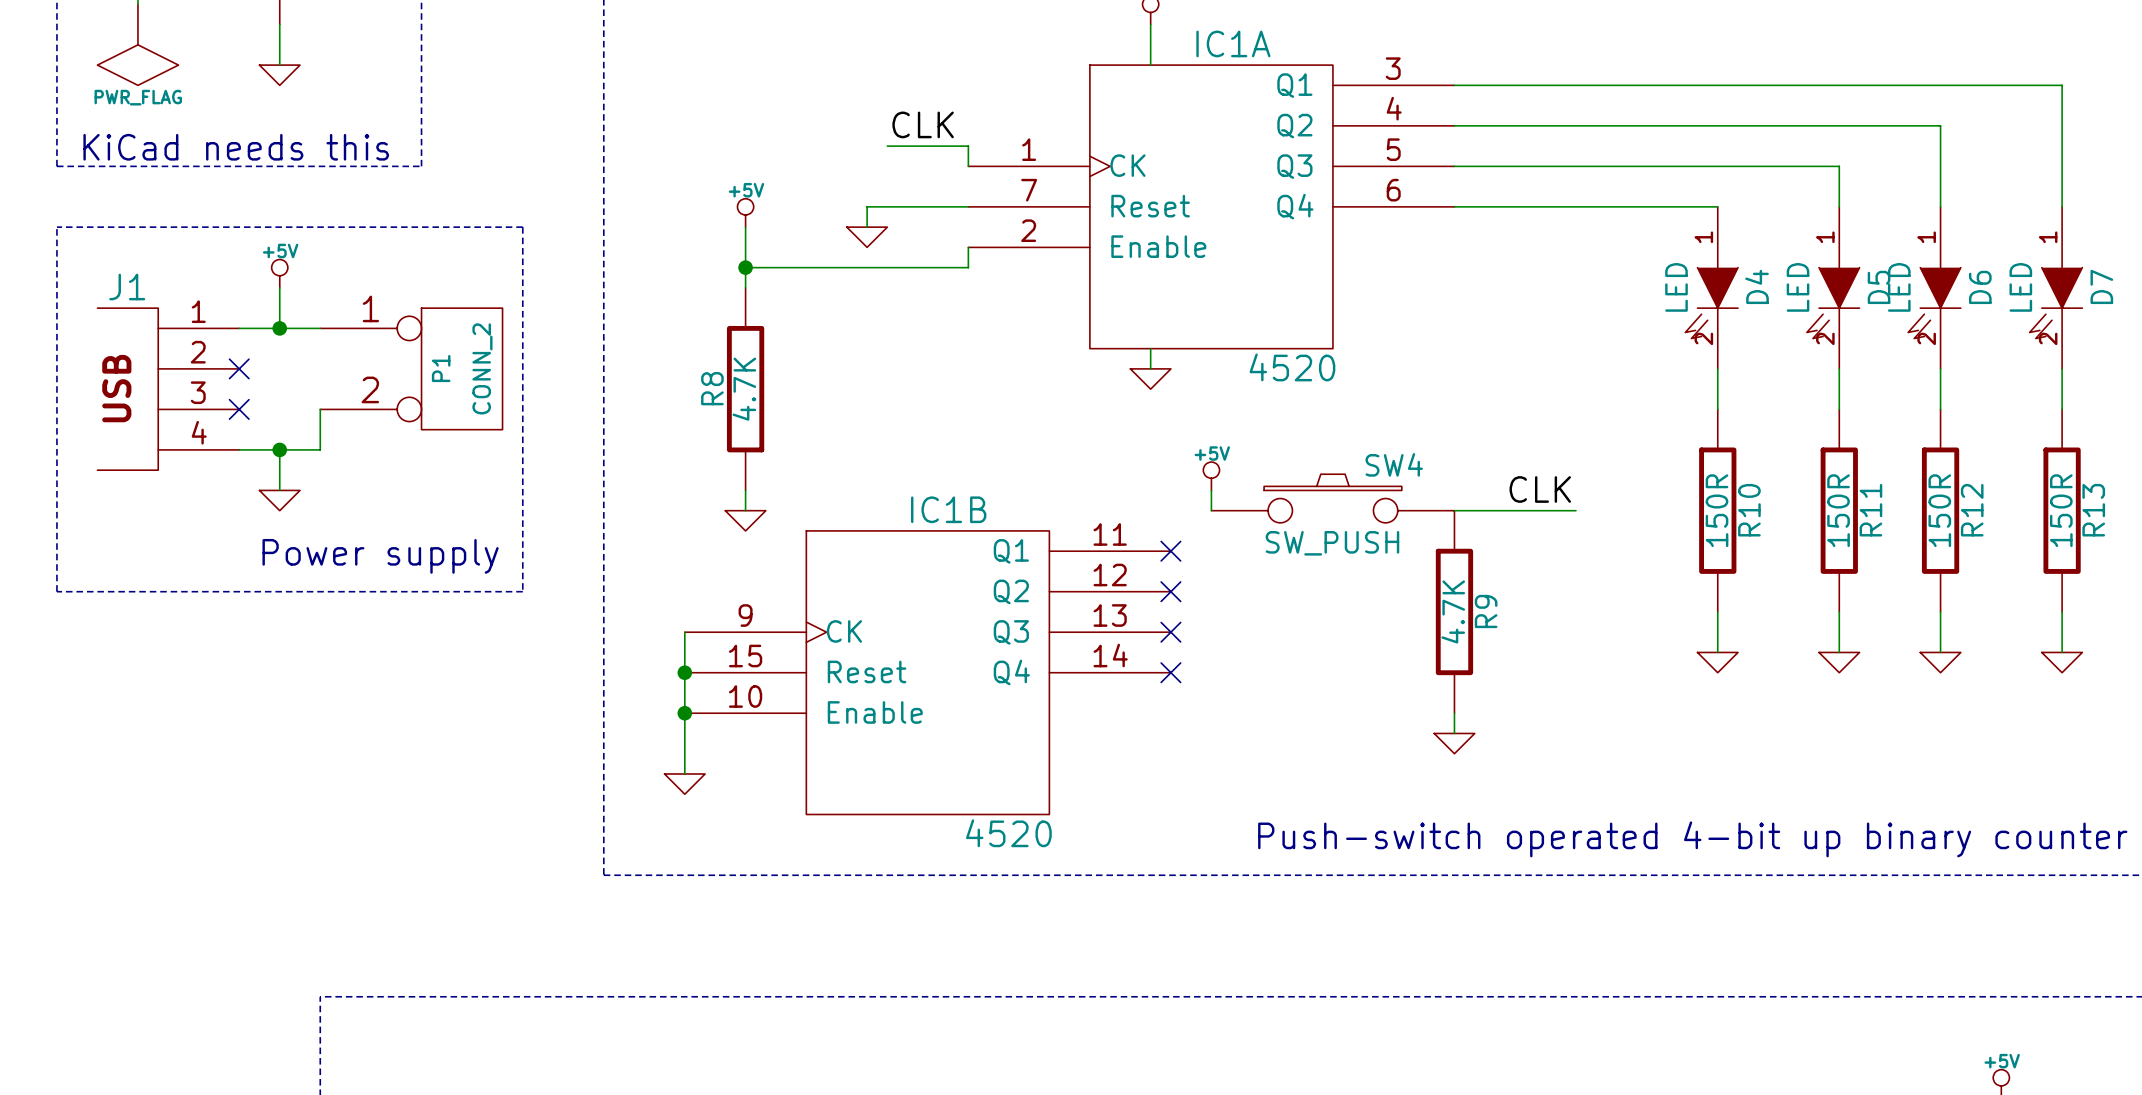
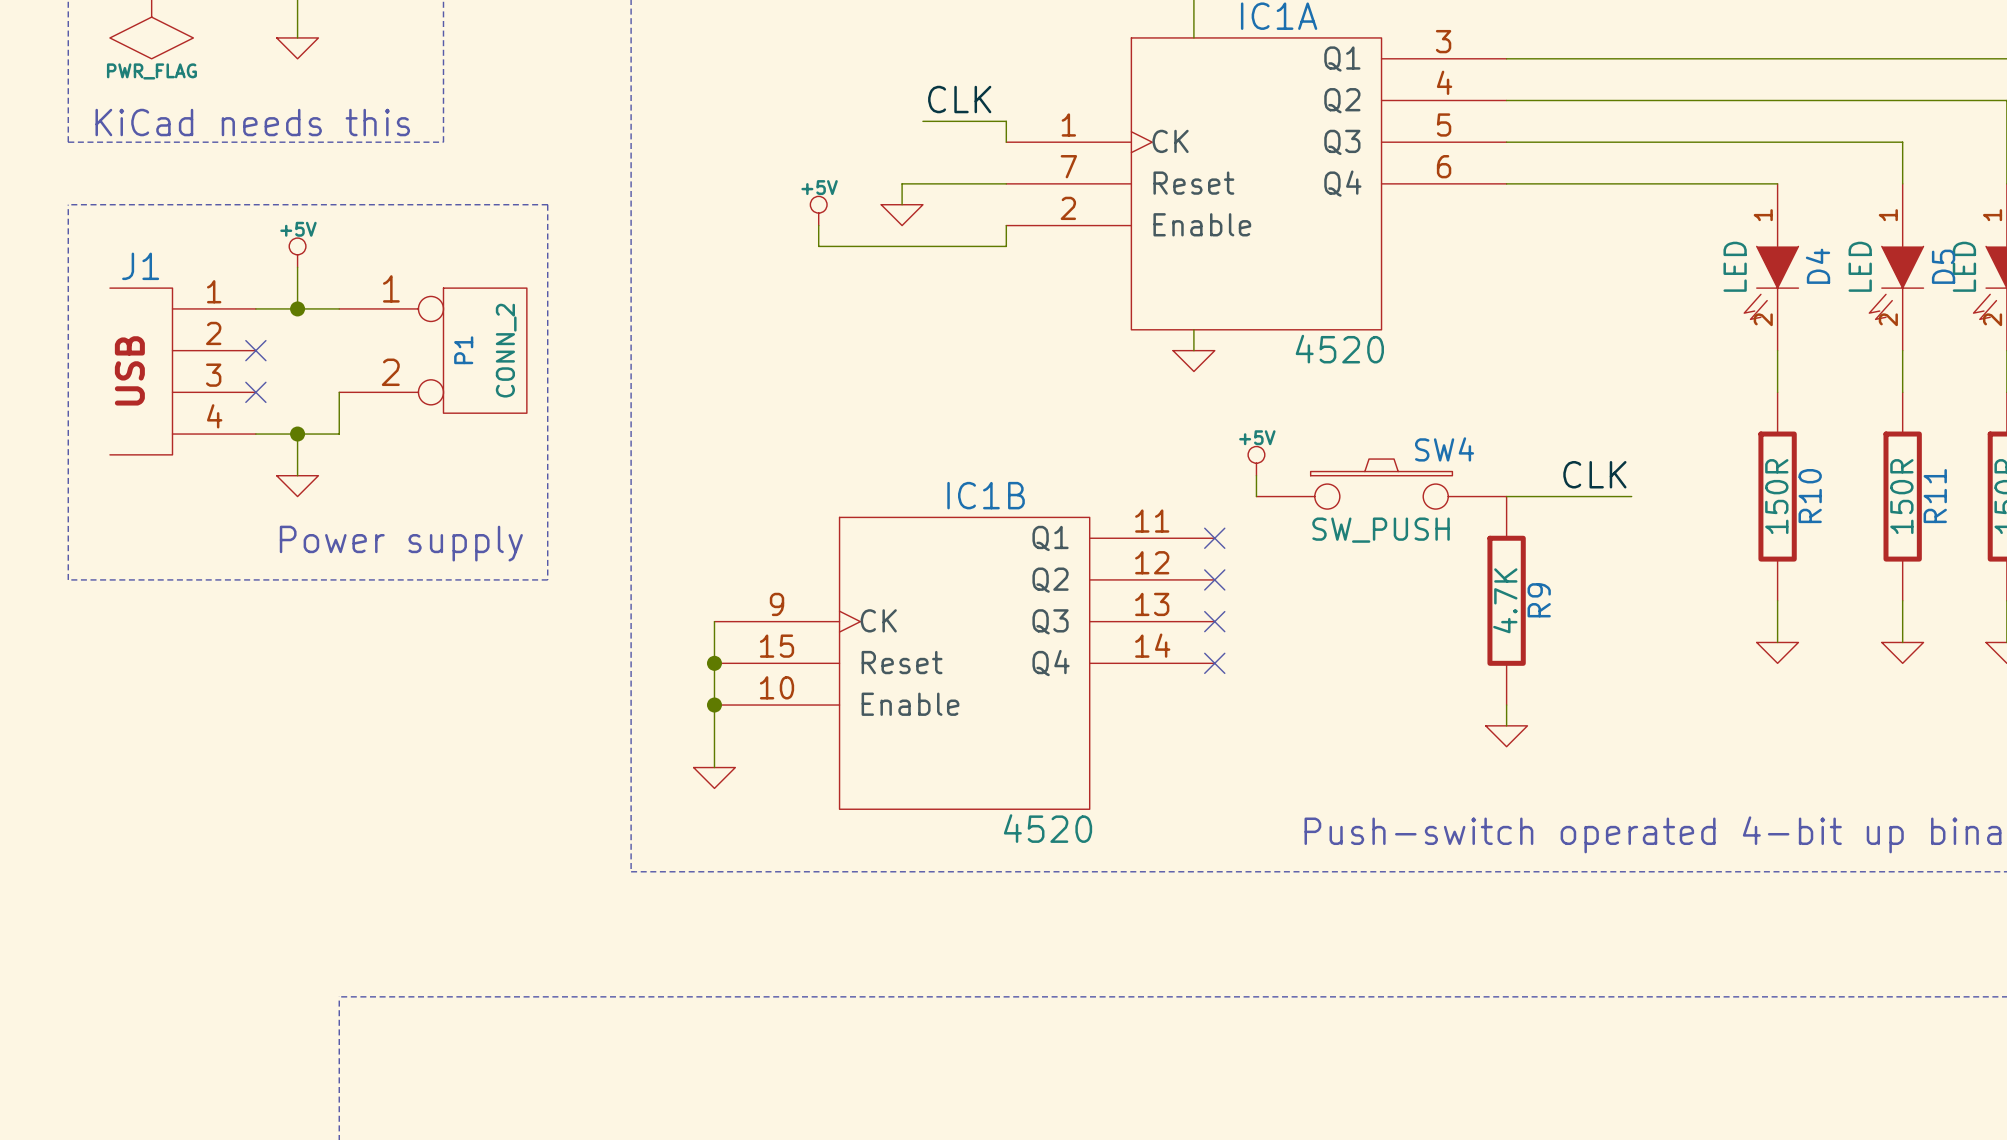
power symbol position: +5V (745, 212) -> +5V (818, 210)
wire: (745, 227) (745, 287) -> none
wire: (745, 267) (786, 267) -> (818, 225) (818, 246)
junction: (745, 267) -> none
R8: 4.7K (745, 389) -> none
wire: (745, 490) (745, 510) -> none
power symbol: (745, 520) -> none

